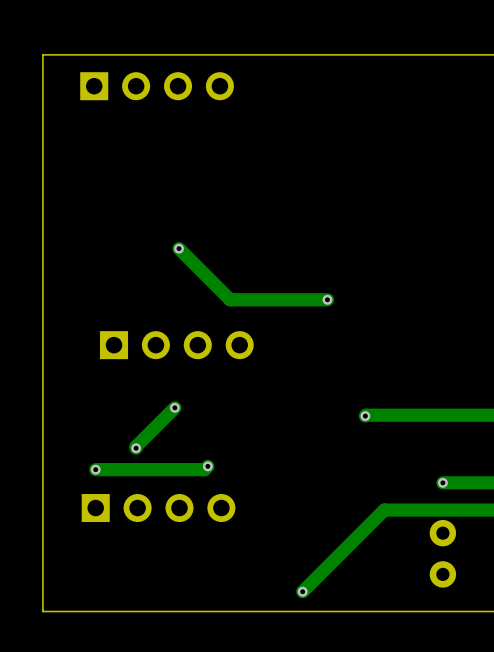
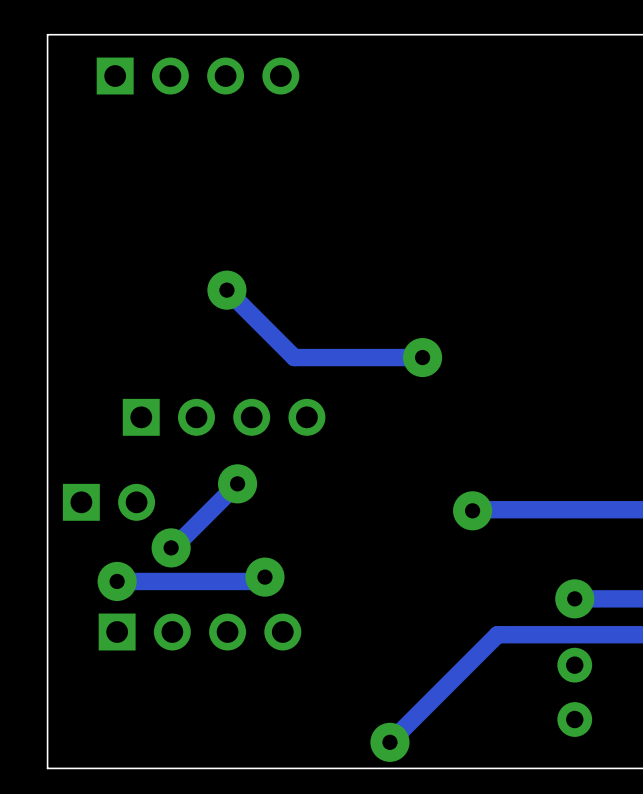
via size: [174, 243, 184, 254] -> [207, 270, 247, 310]
via size: [322, 294, 333, 305] -> [403, 337, 443, 378]
via: none -> (237, 483)
via: (174, 407) -> none
part: none -> (108, 502)
via size: [360, 411, 371, 422] -> [453, 491, 493, 531]
via size: [131, 443, 142, 454] -> [151, 528, 191, 568]
via size: [202, 461, 213, 472] -> [245, 557, 285, 597]
via size: [90, 464, 101, 475] -> [97, 561, 137, 602]
via size: [437, 477, 448, 488] -> [555, 579, 595, 619]
via size: [297, 586, 308, 597] -> [370, 722, 410, 762]

